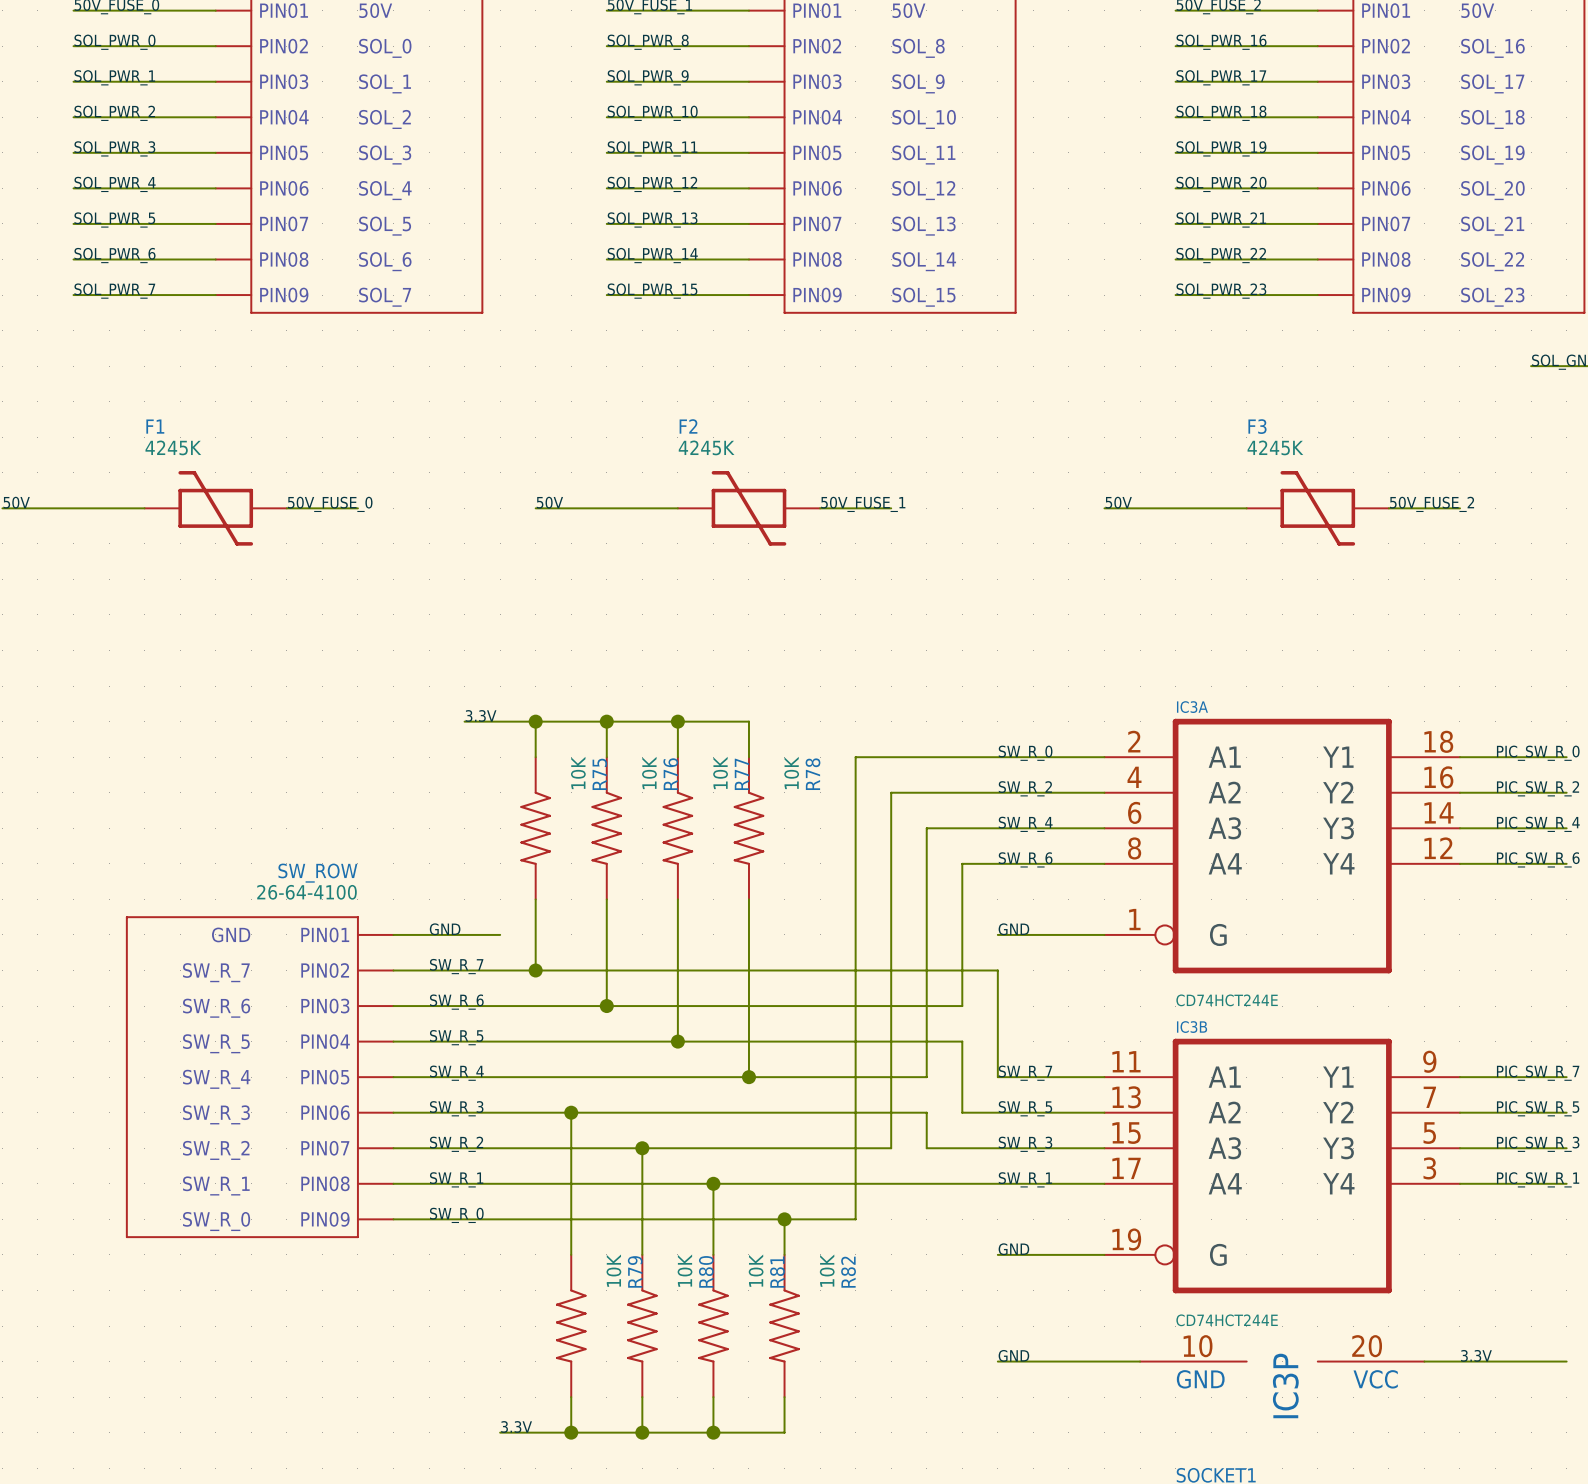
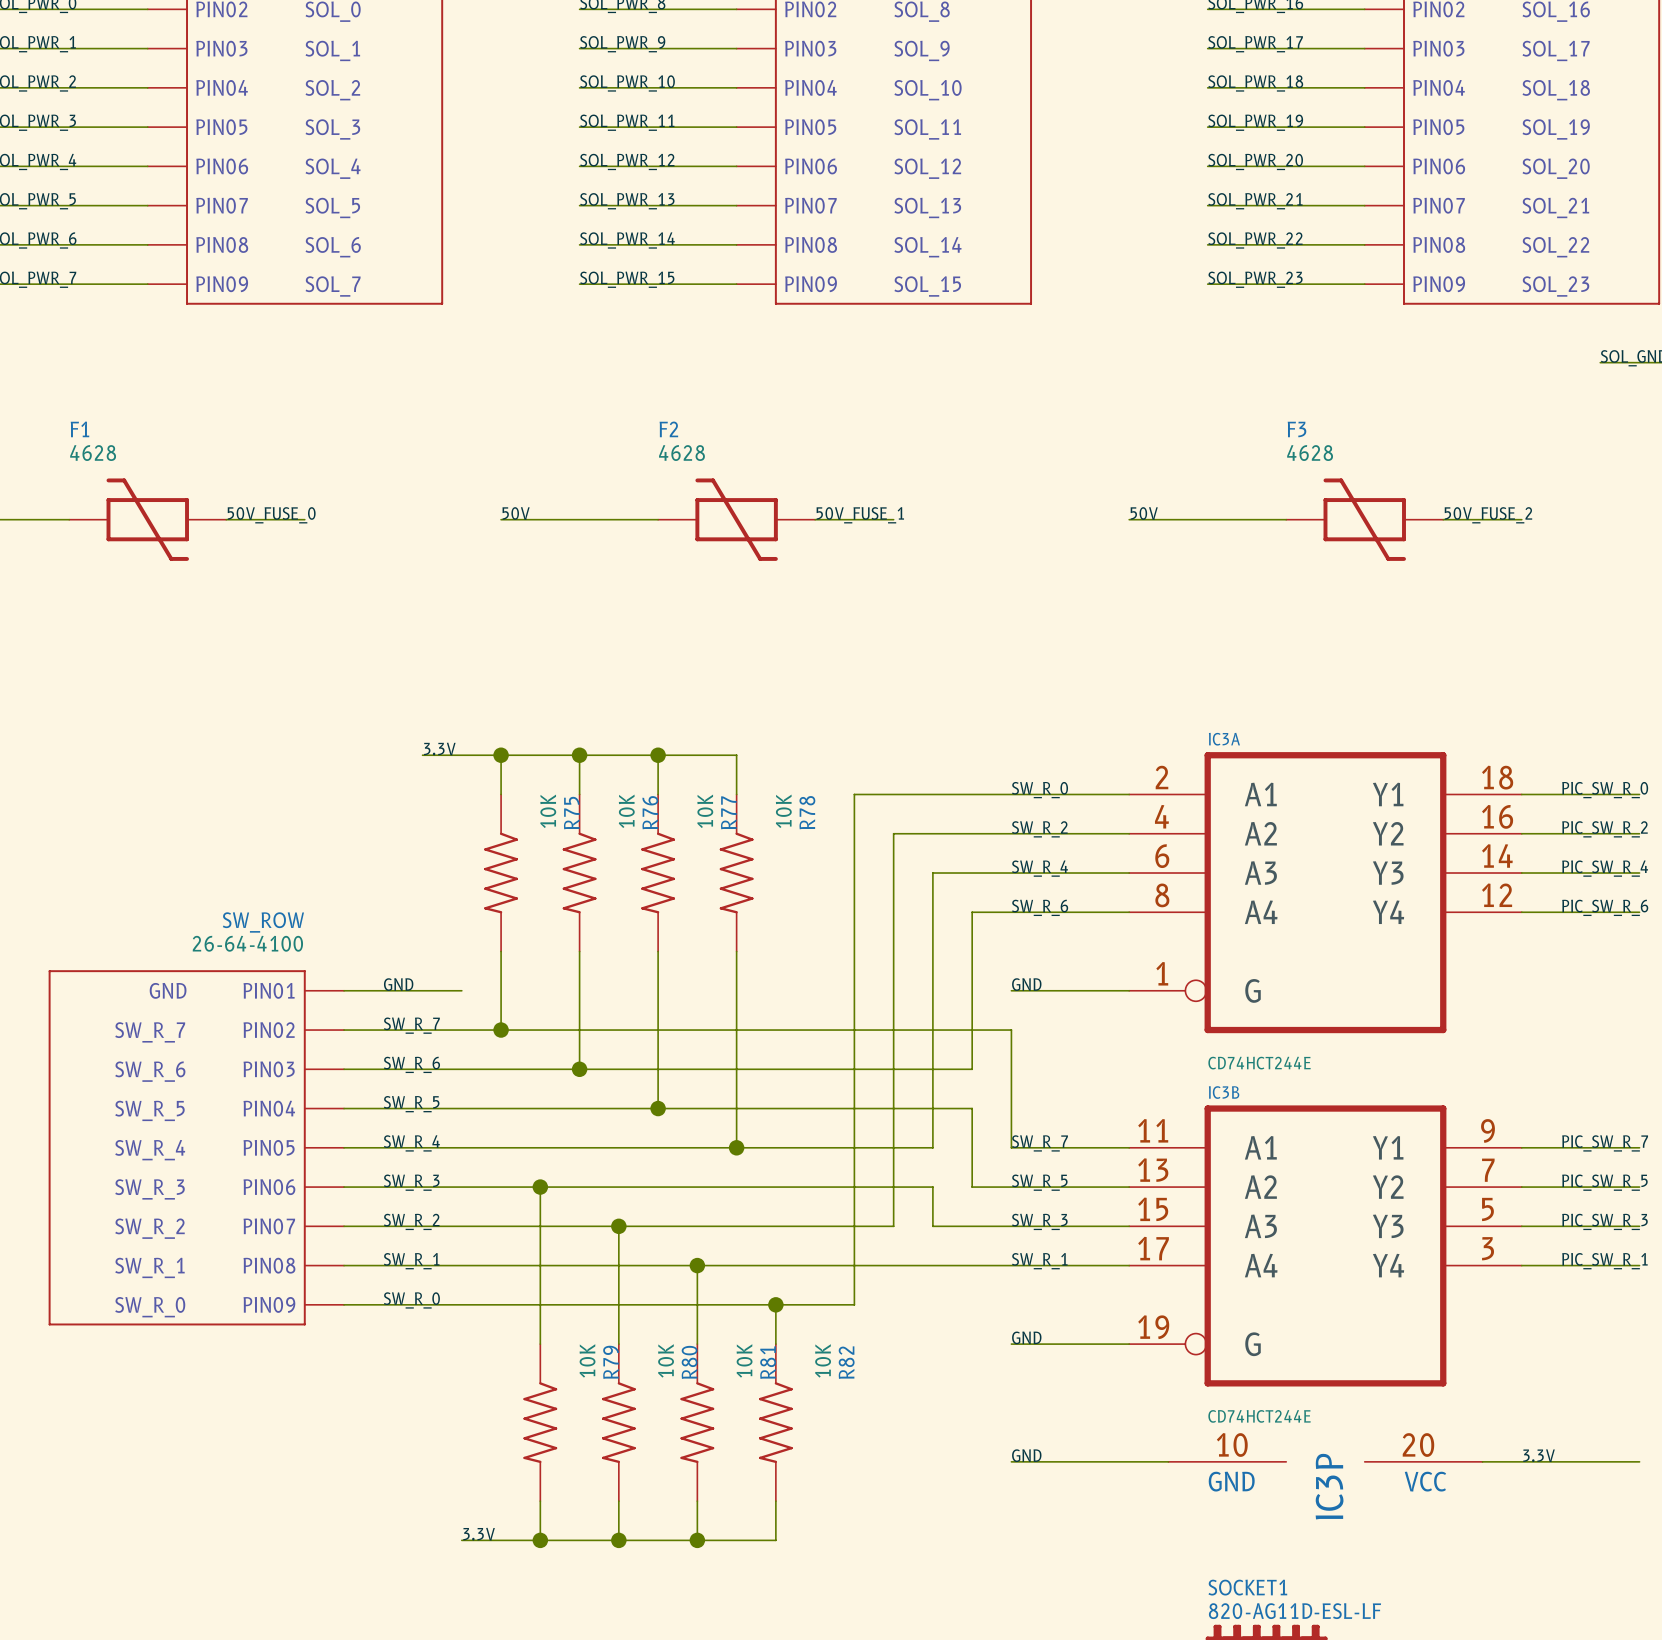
F1 value: 4245K (173, 447) -> 4628 (93, 453)
F2 value: 4245K (706, 447) -> 4628 (681, 453)
F3 value: 4245K (1275, 447) -> 4628 (1310, 453)

